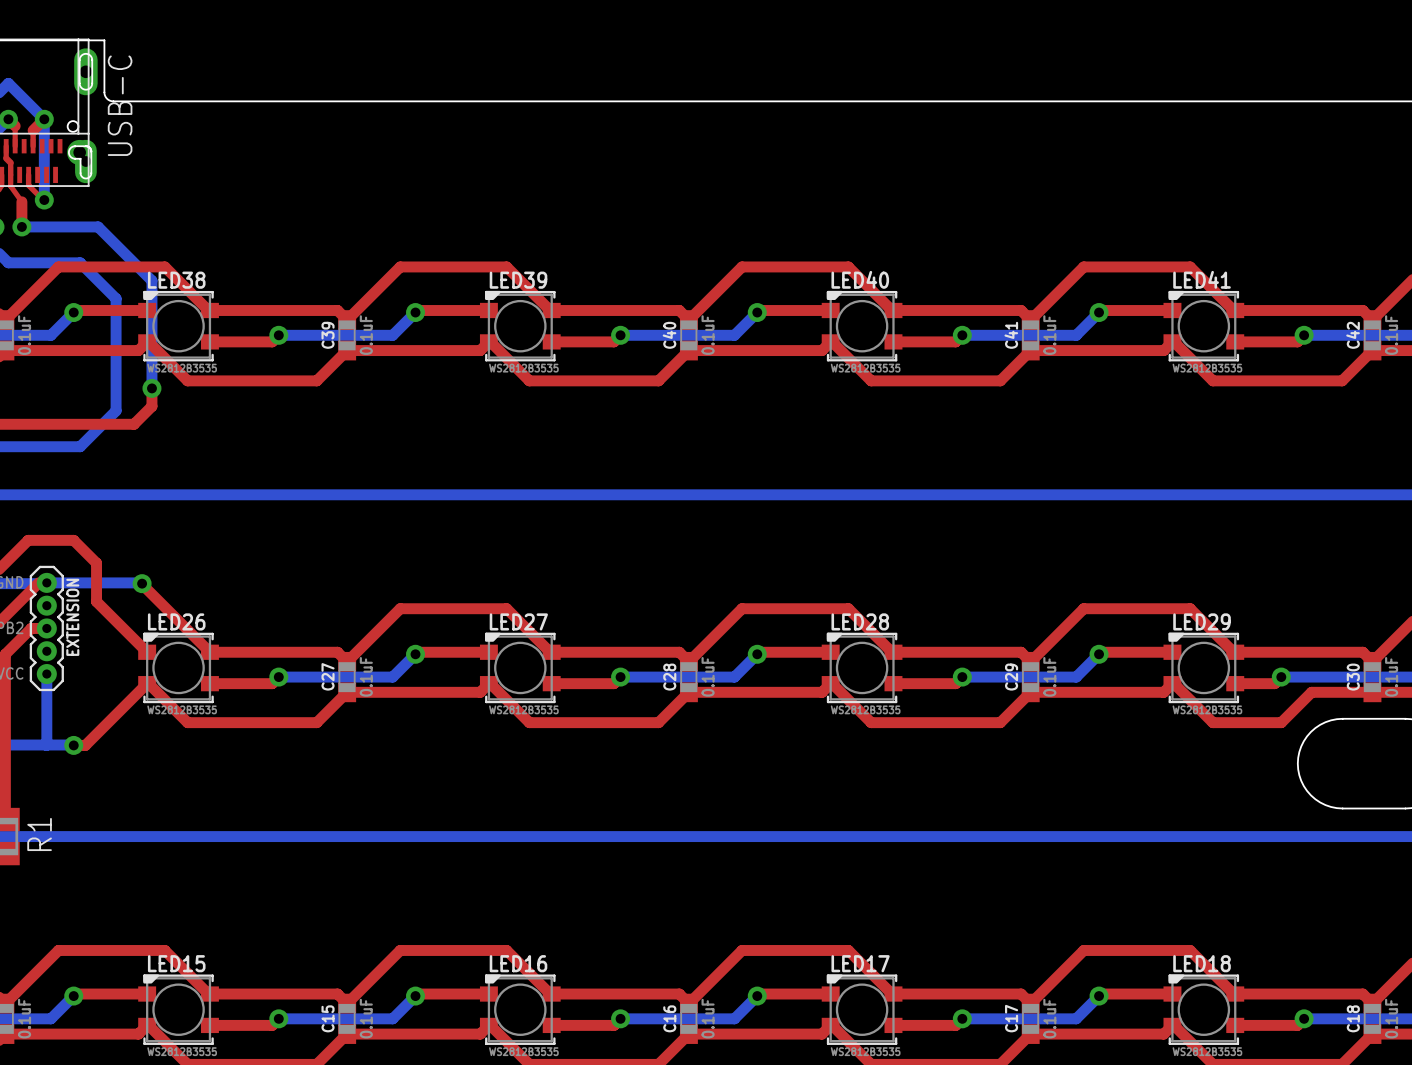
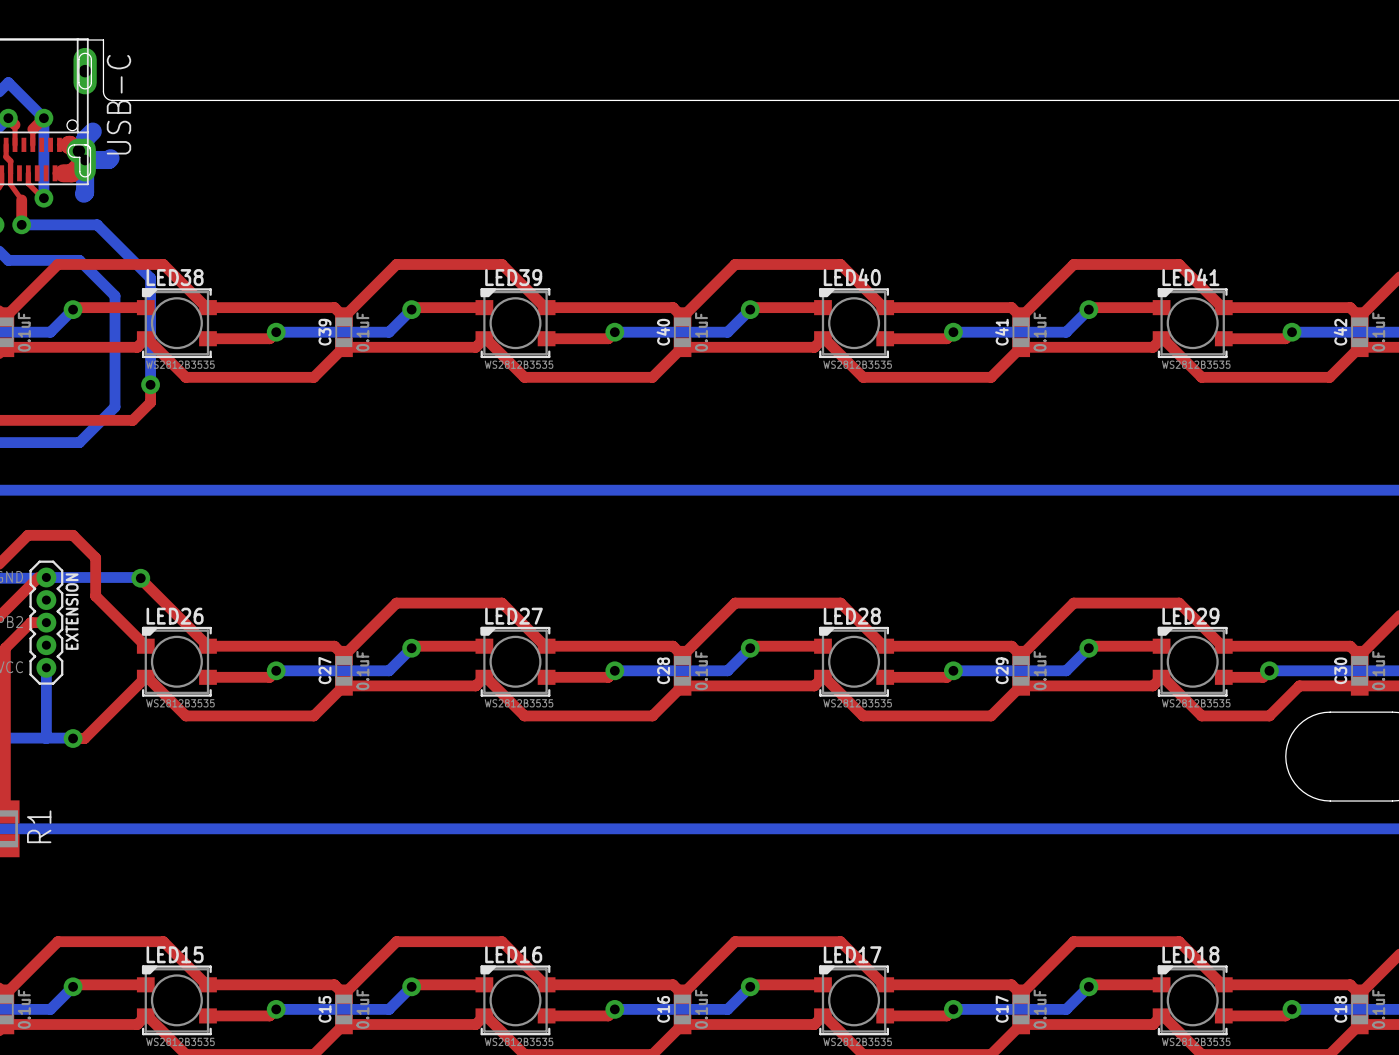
bottom track: none -> (92, 131) (85, 139) (83, 193)
top track: none -> (68, 144) (85, 160) (71, 173) (55, 173)
bottom track: none -> (110, 158) (108, 160) (85, 160)

